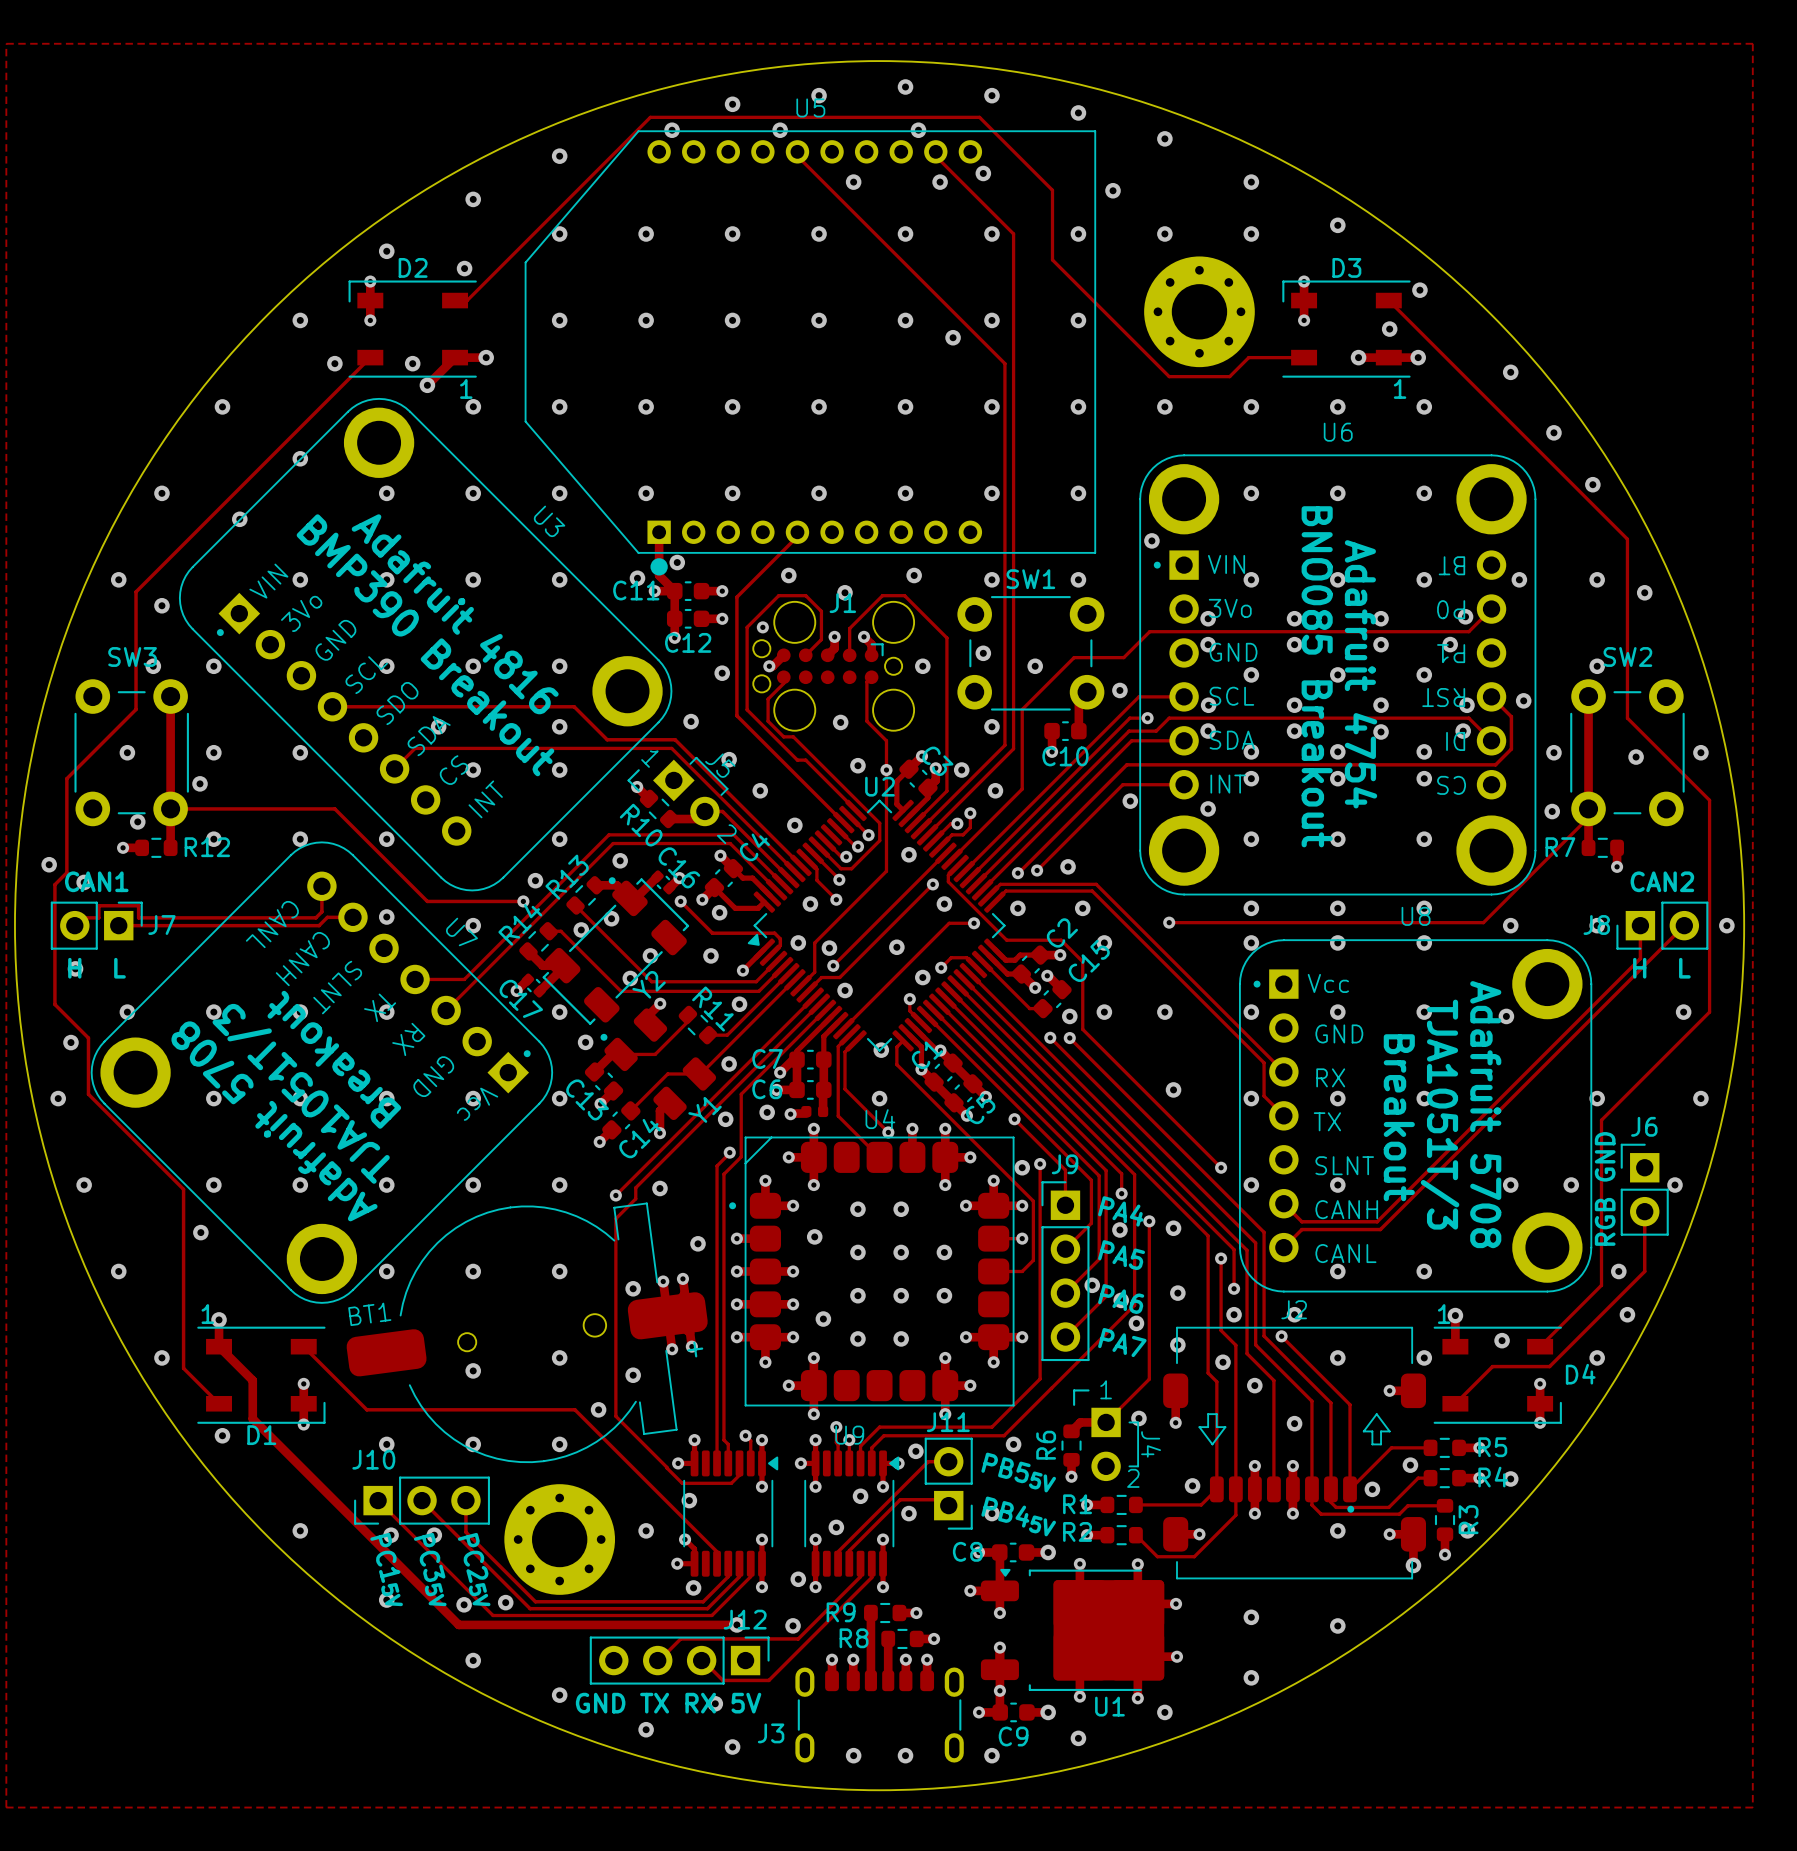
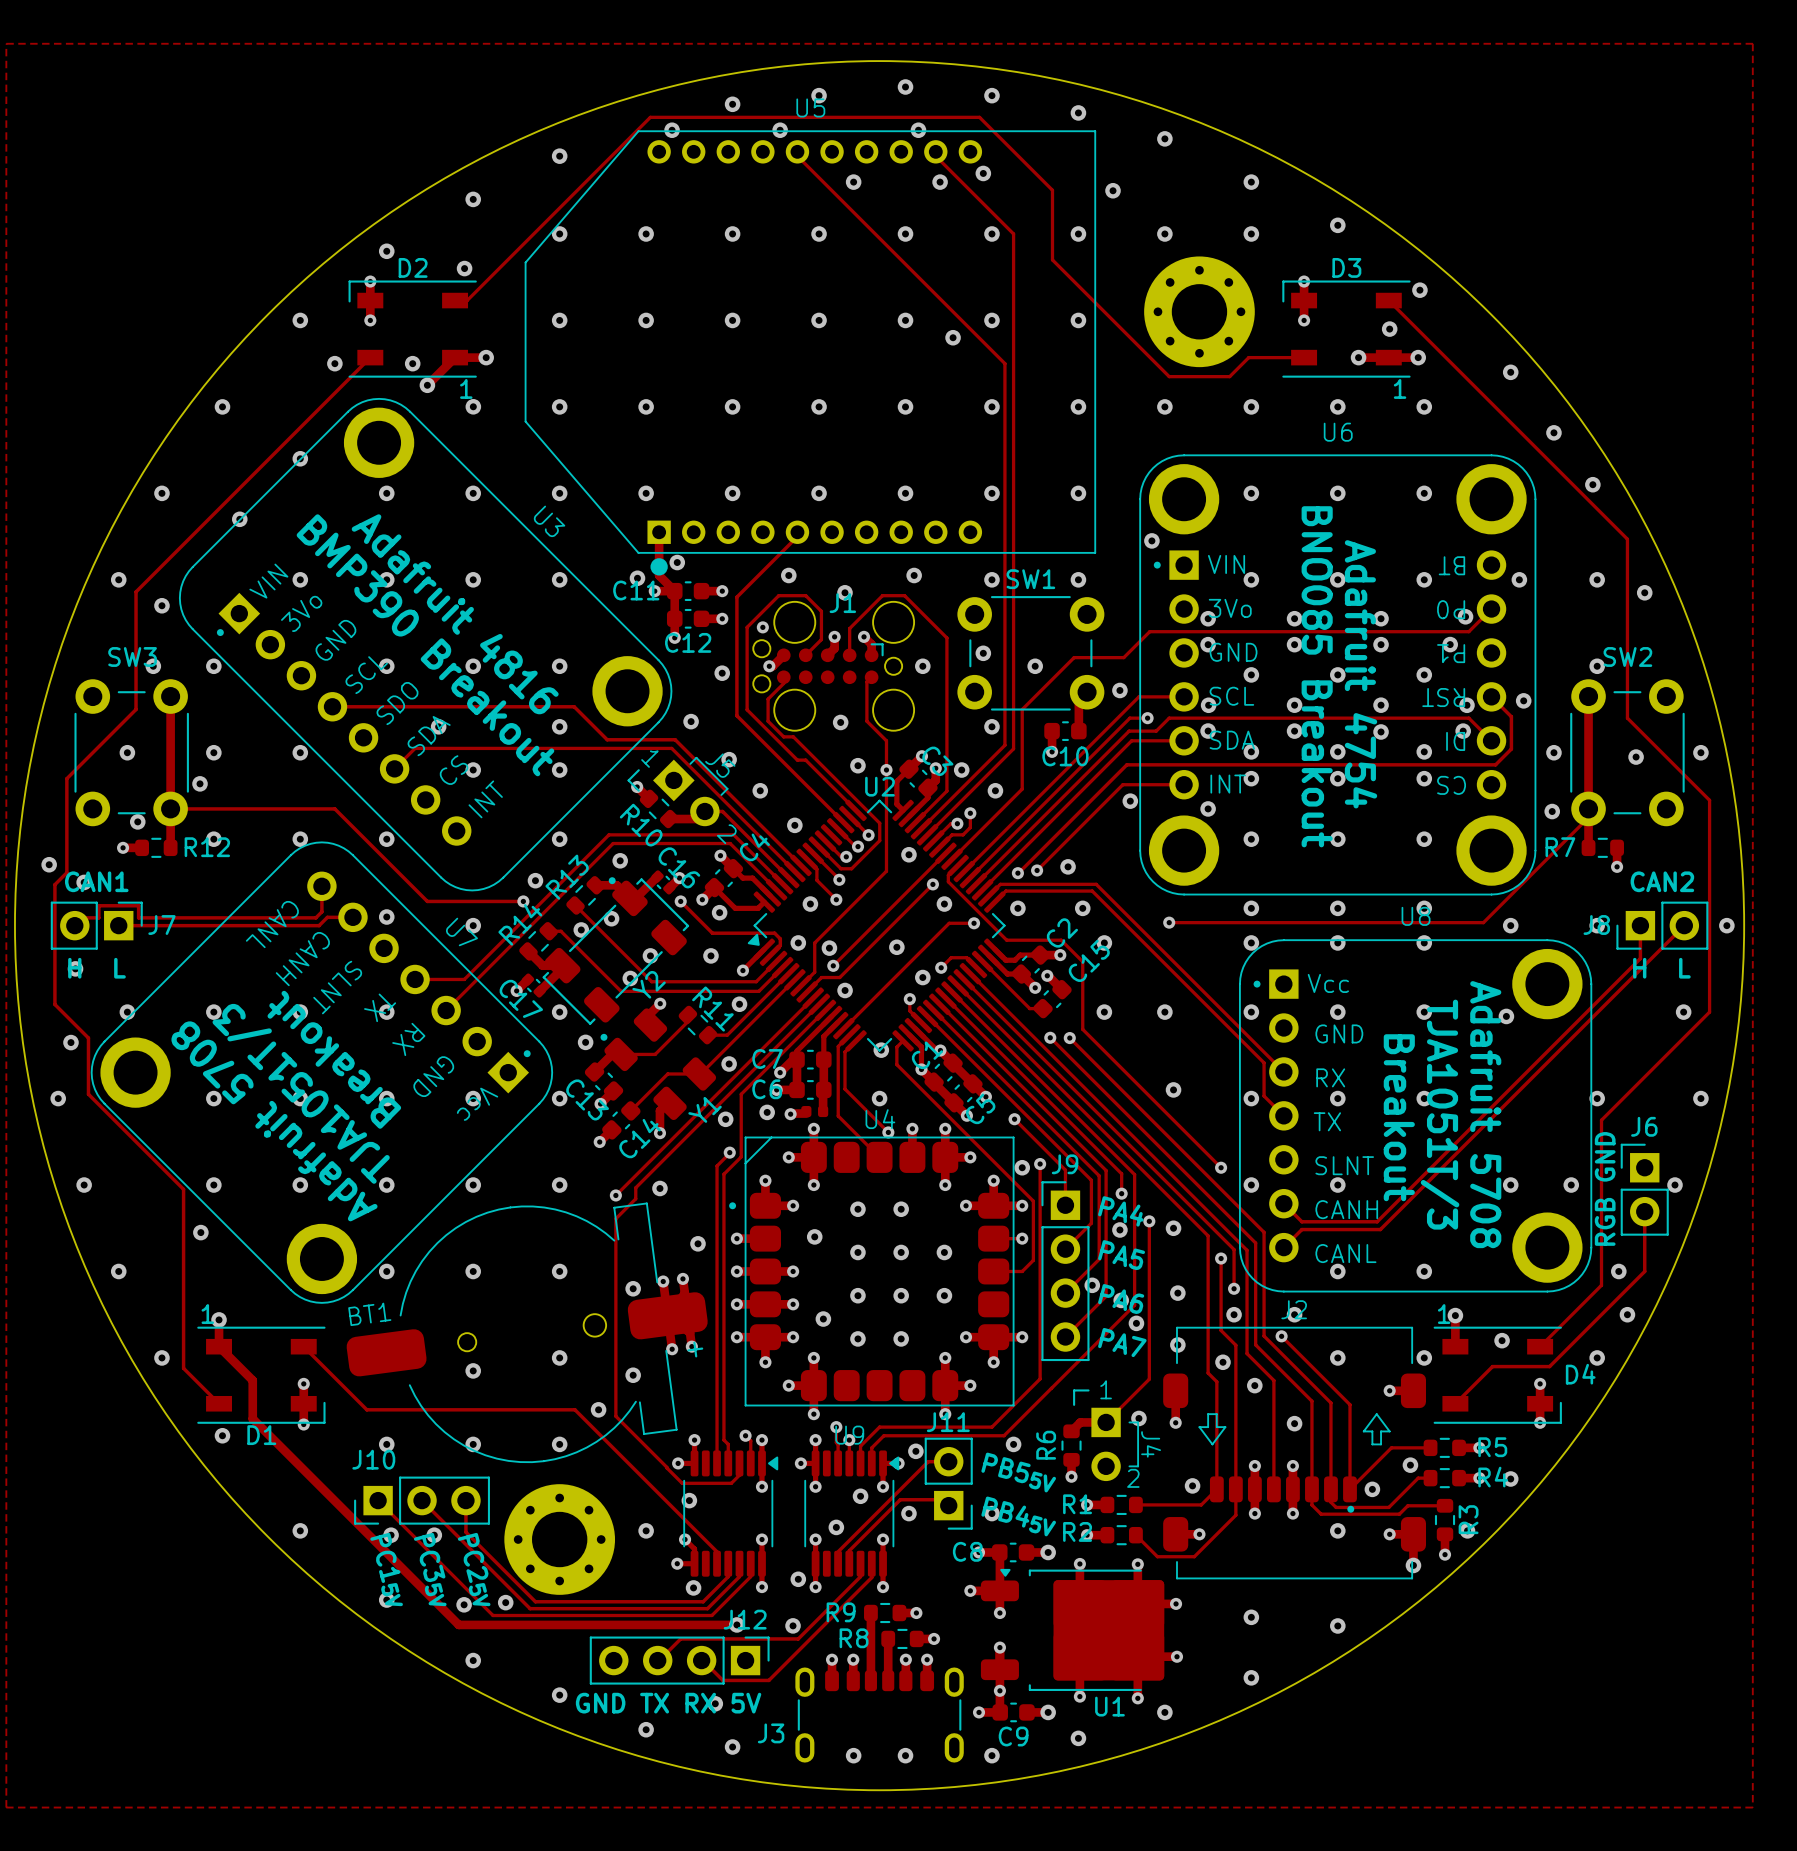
via: (1069, 1016) -> none

